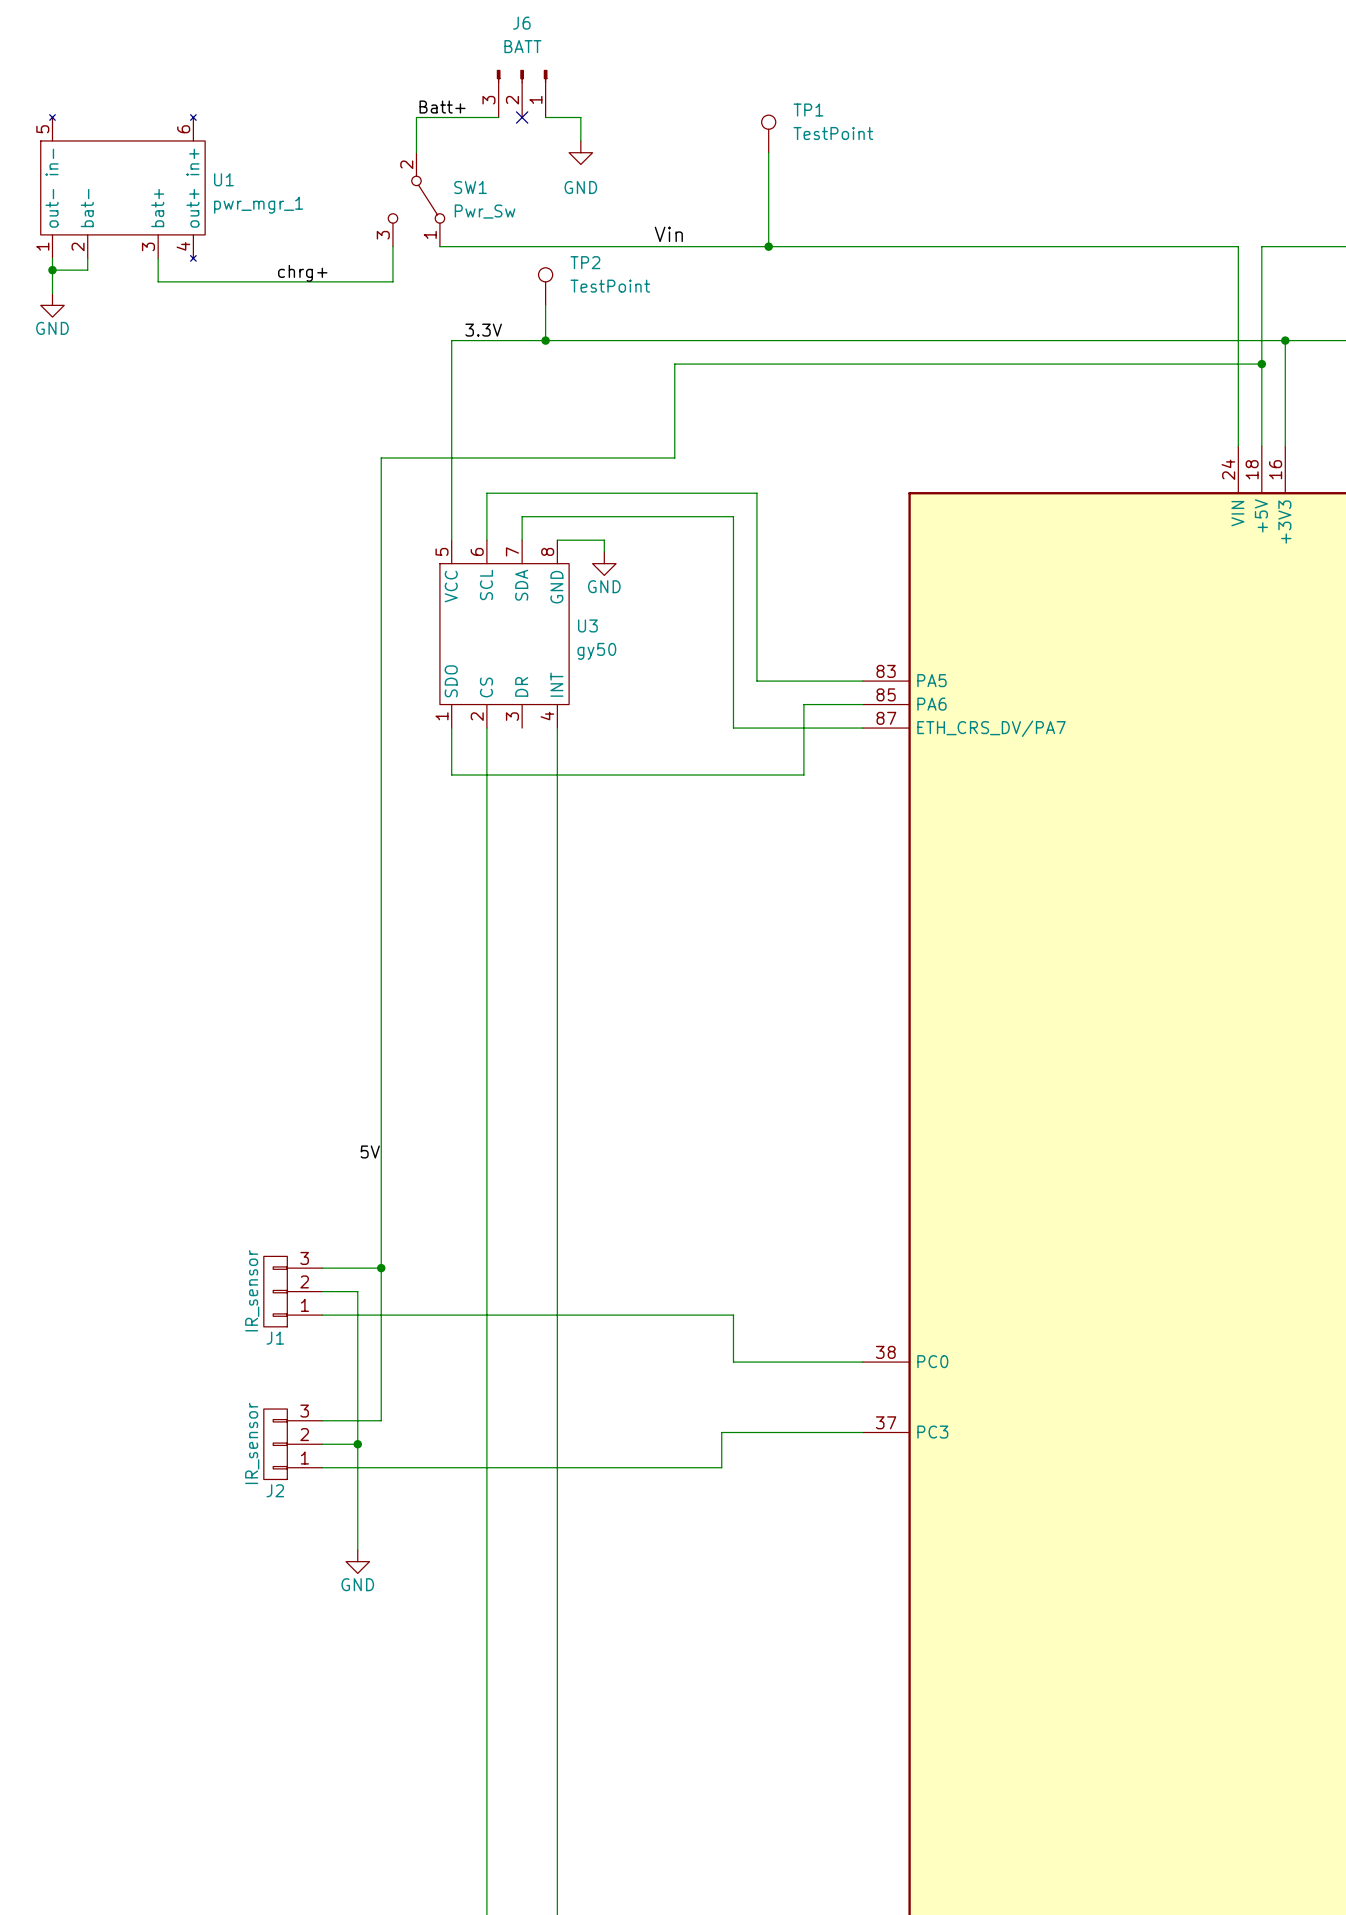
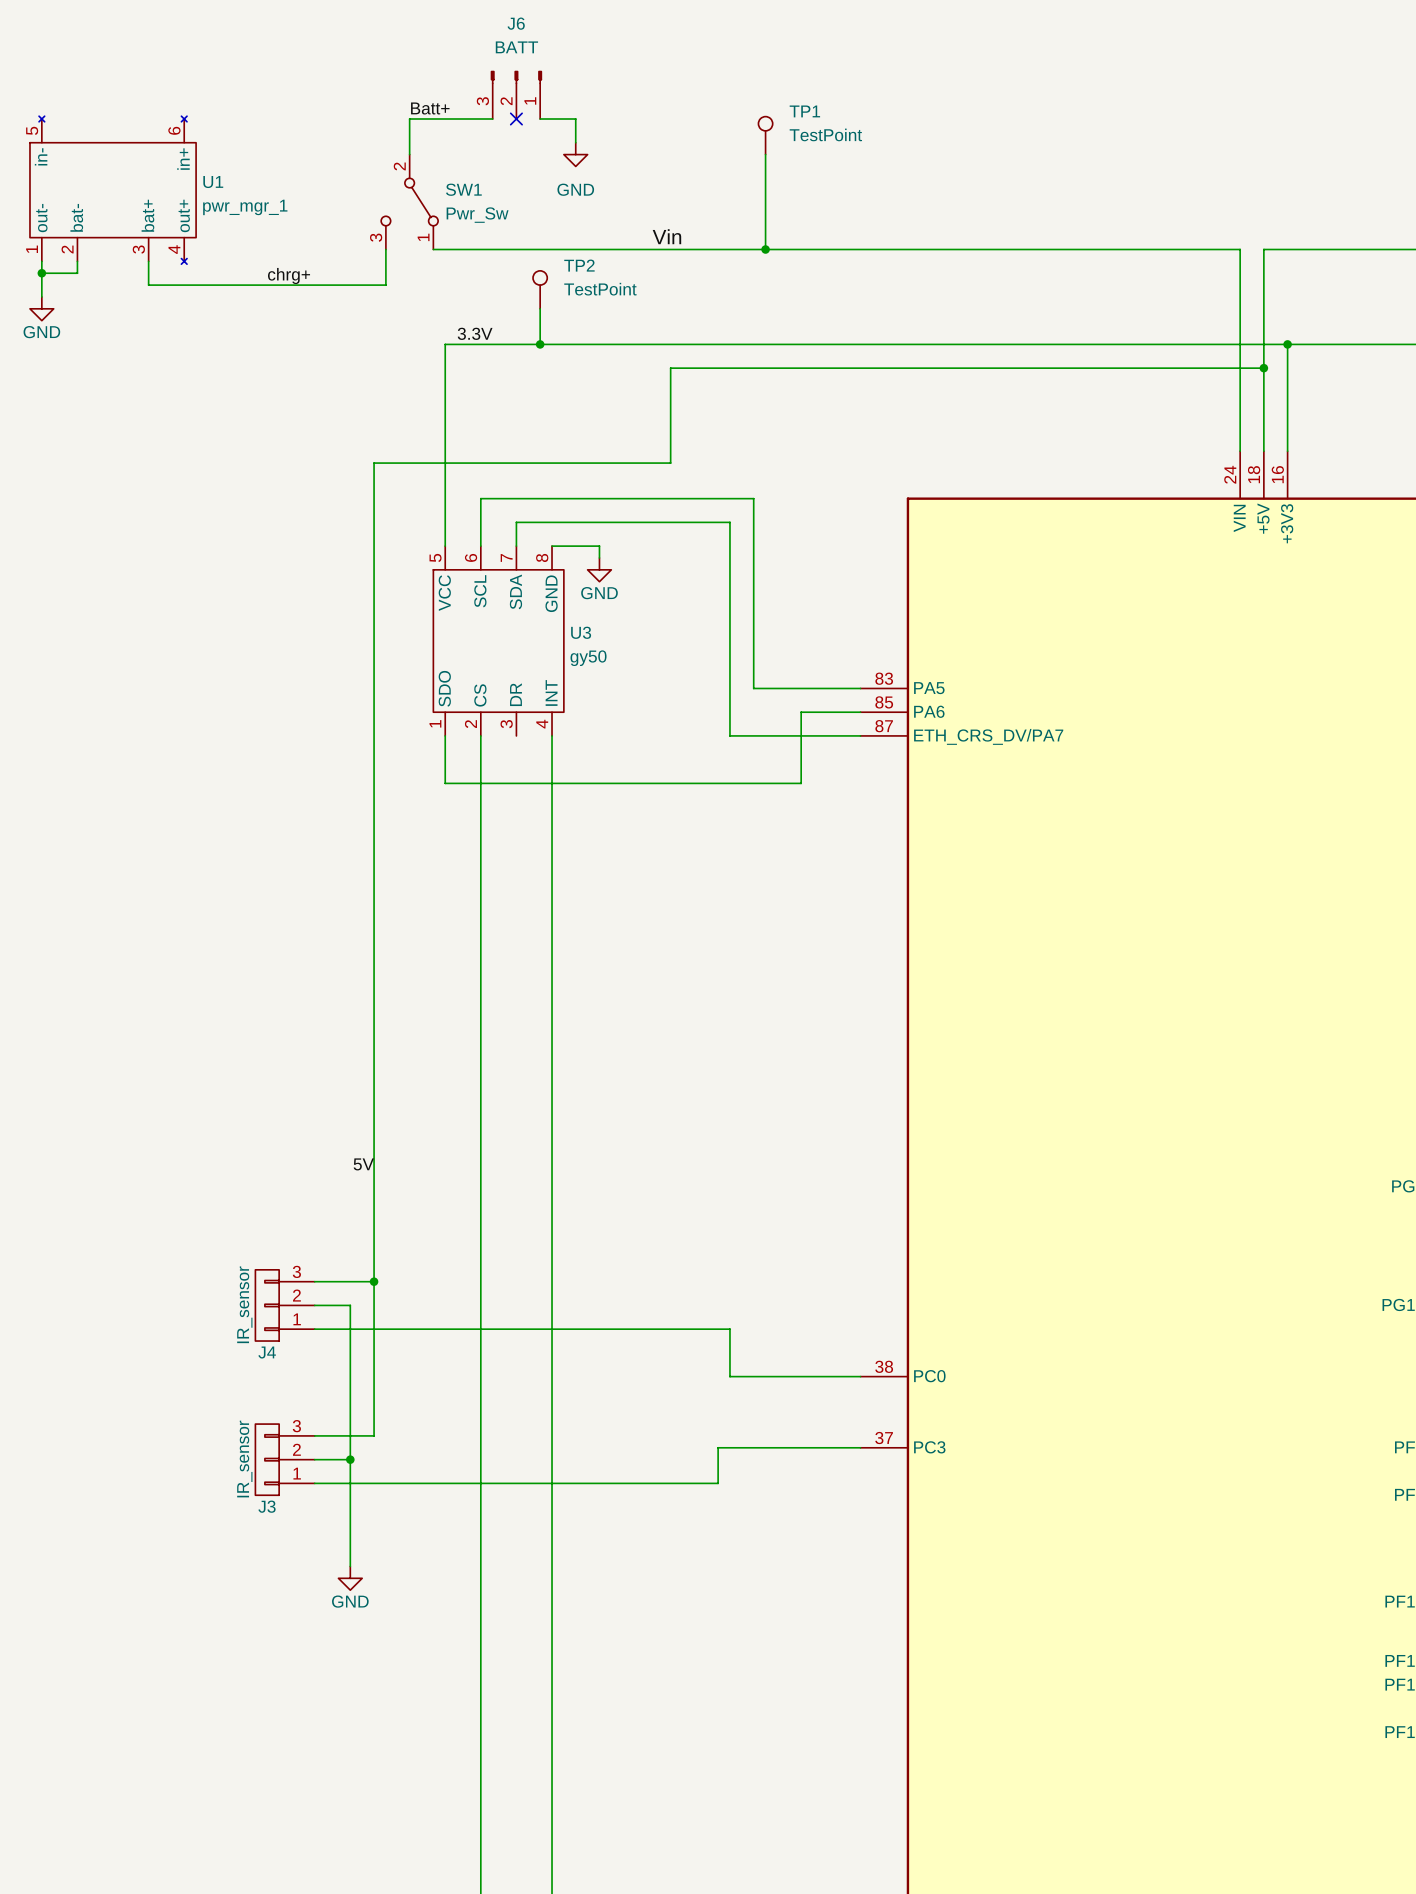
J1 name: J1 (275, 1338) -> J4 (267, 1352)
J2 name: J2 (275, 1490) -> J3 (267, 1506)

